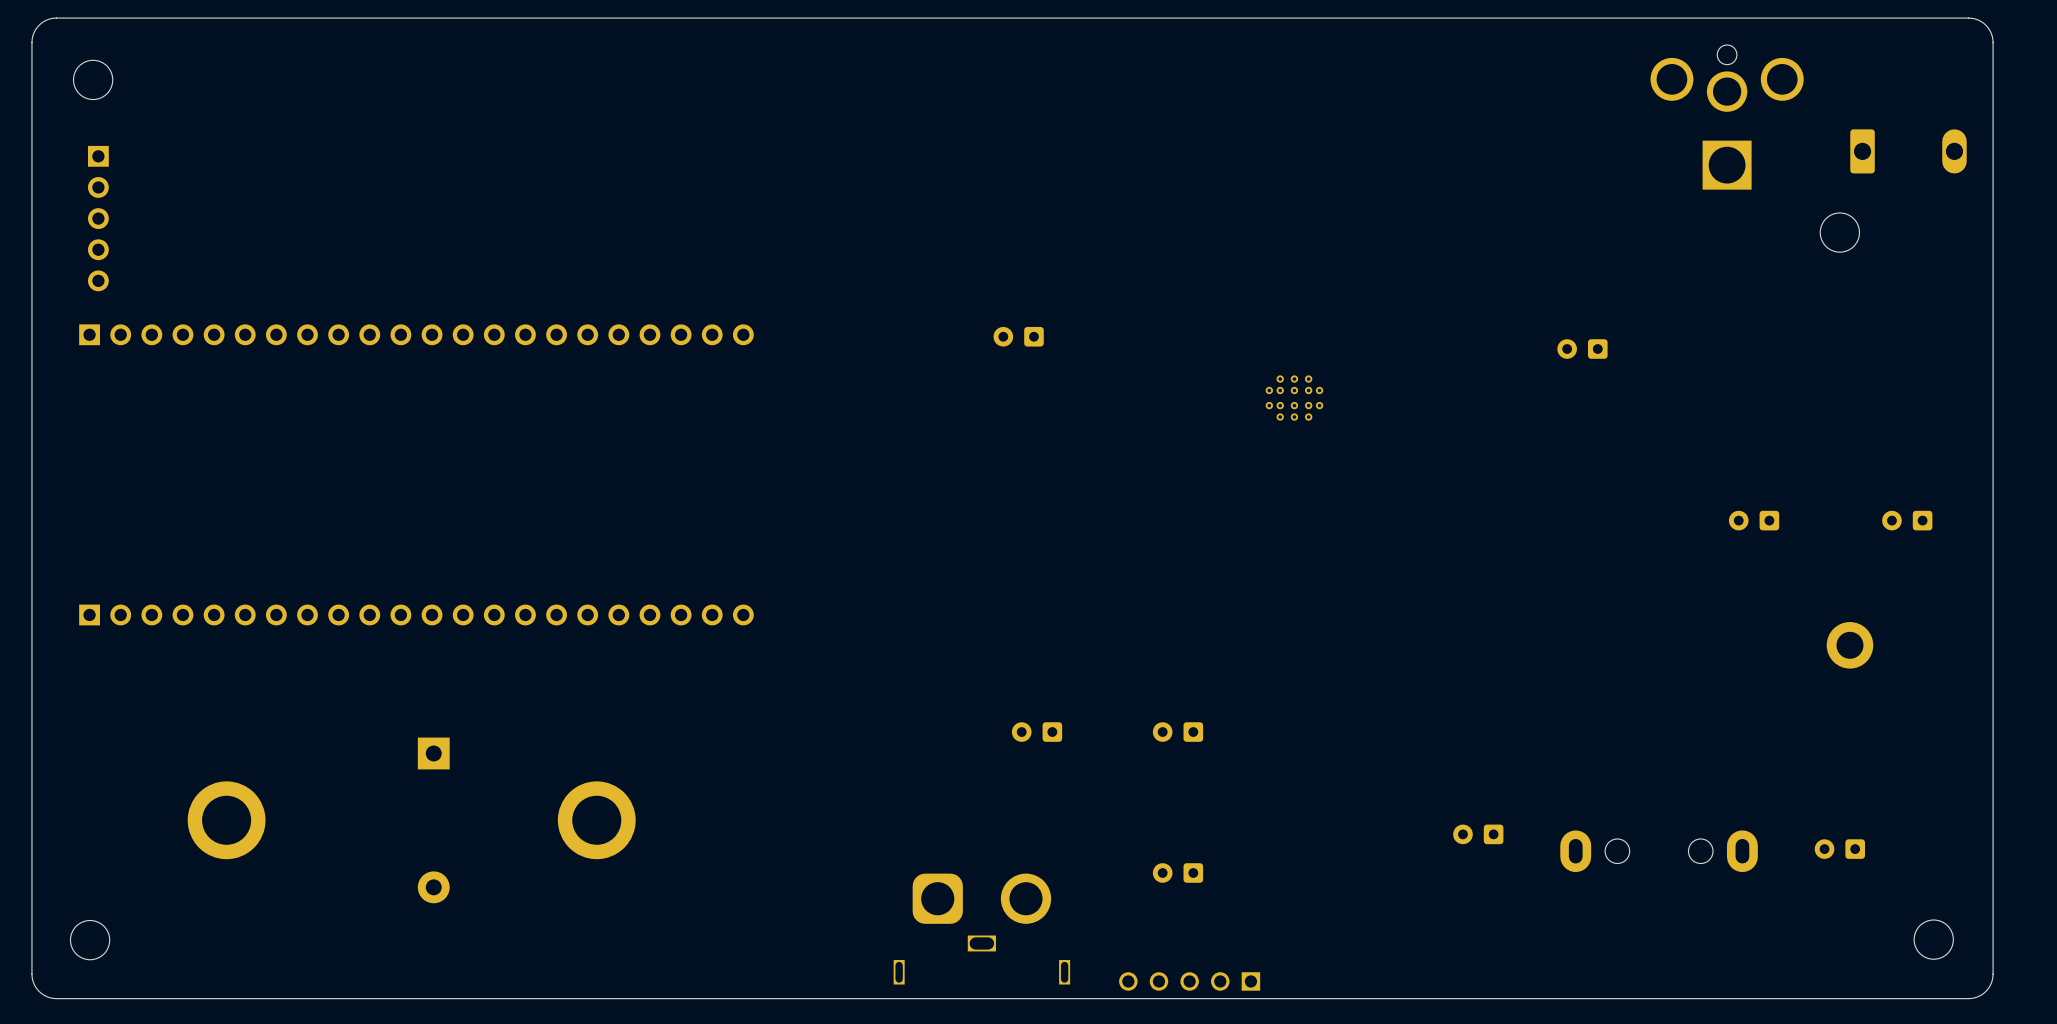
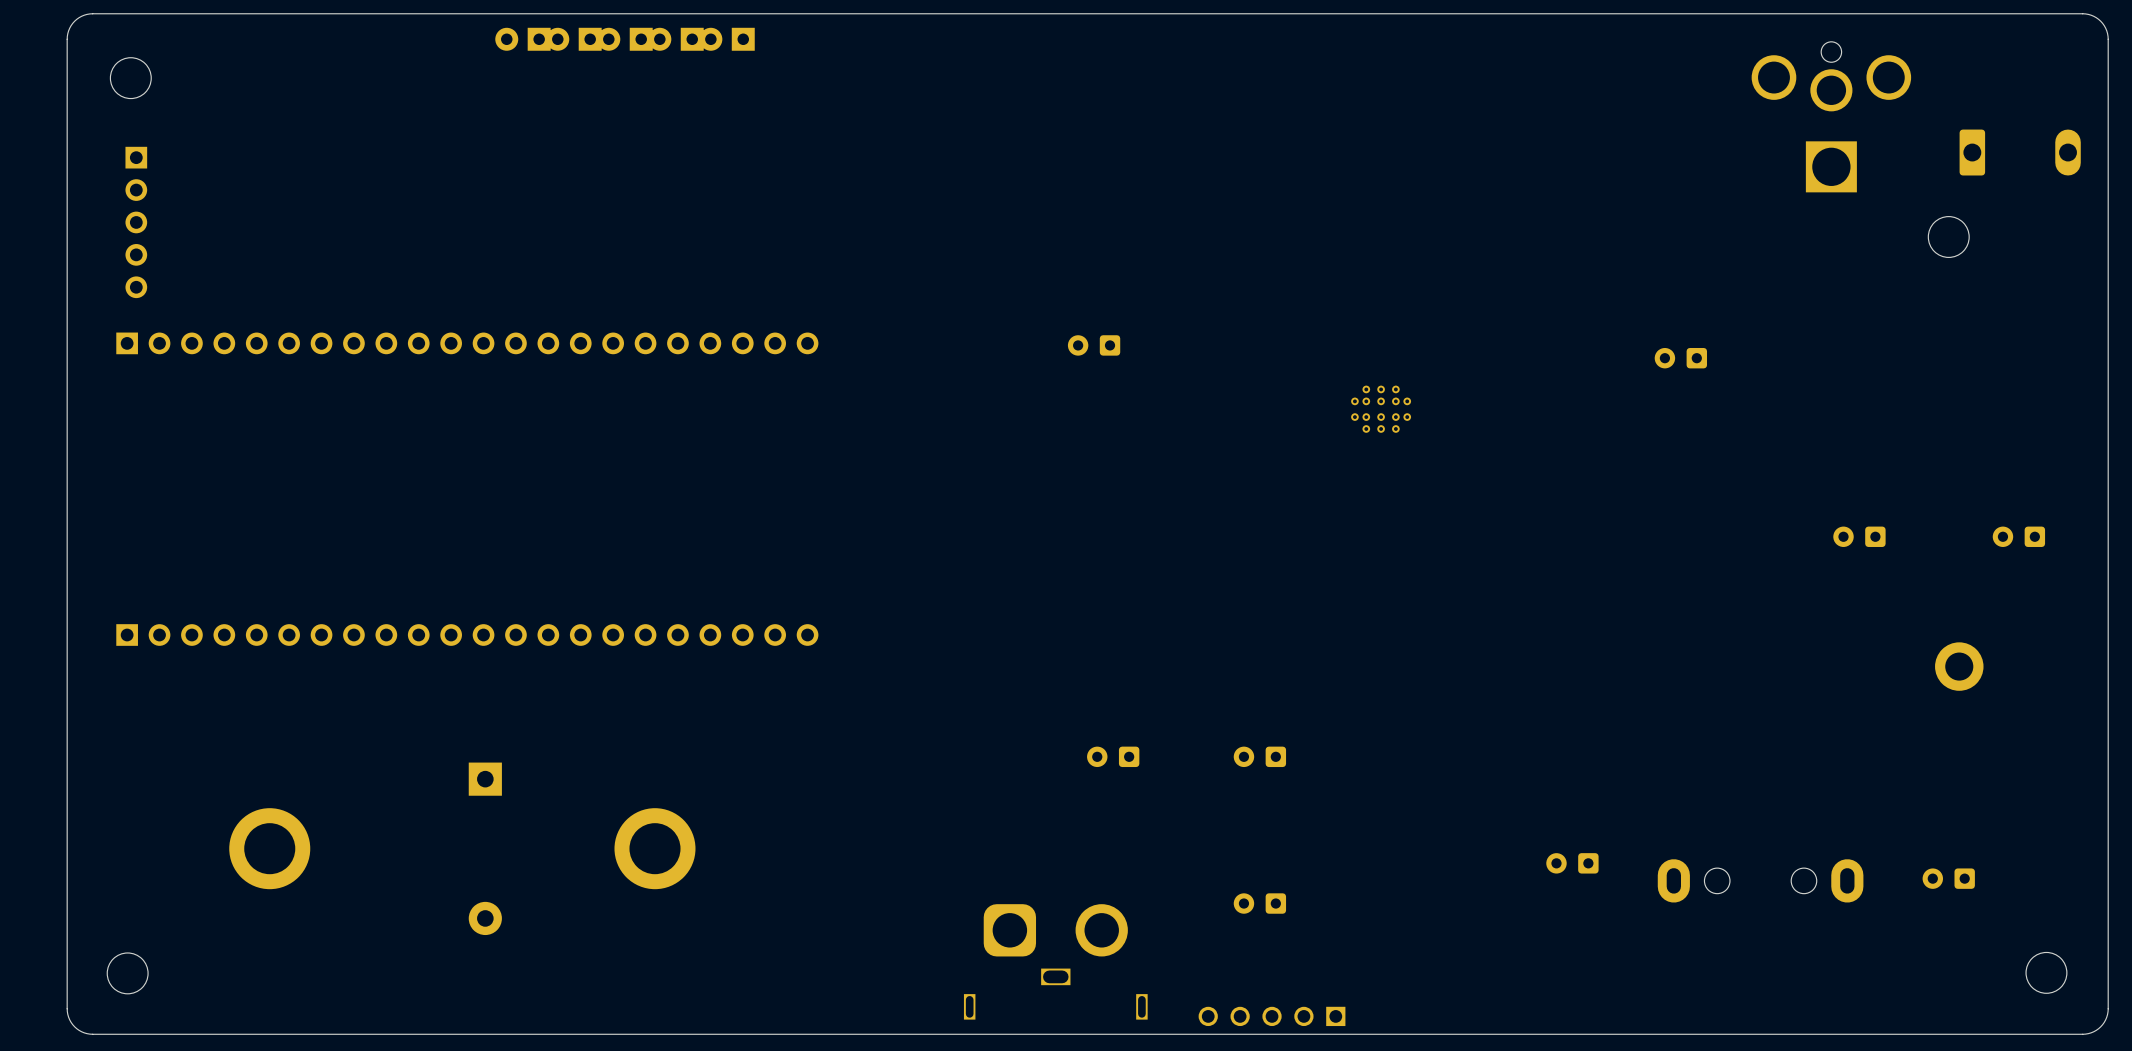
part: none -> (522, 39)
part: none -> (573, 39)
part: none -> (625, 39)
part: none -> (676, 39)
part: none -> (727, 39)

